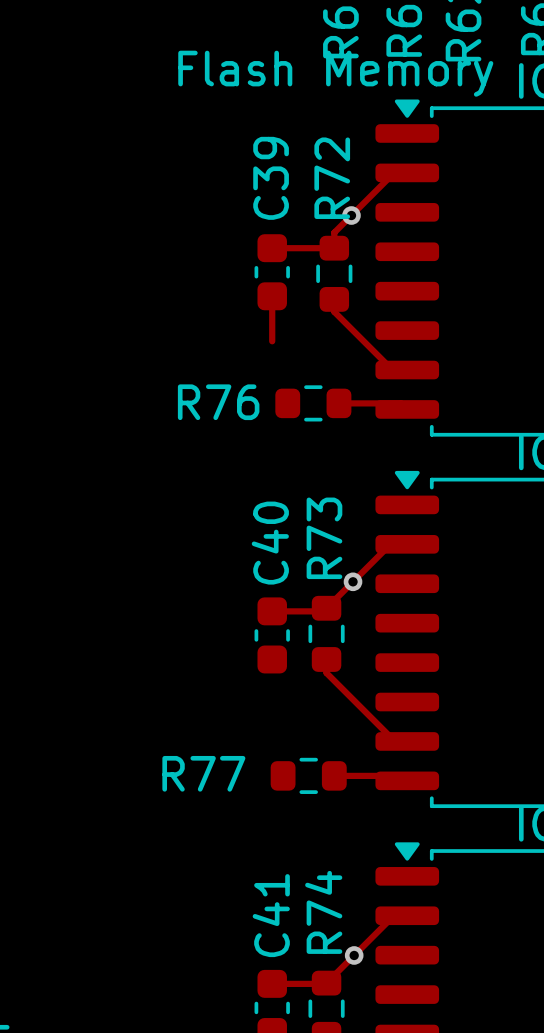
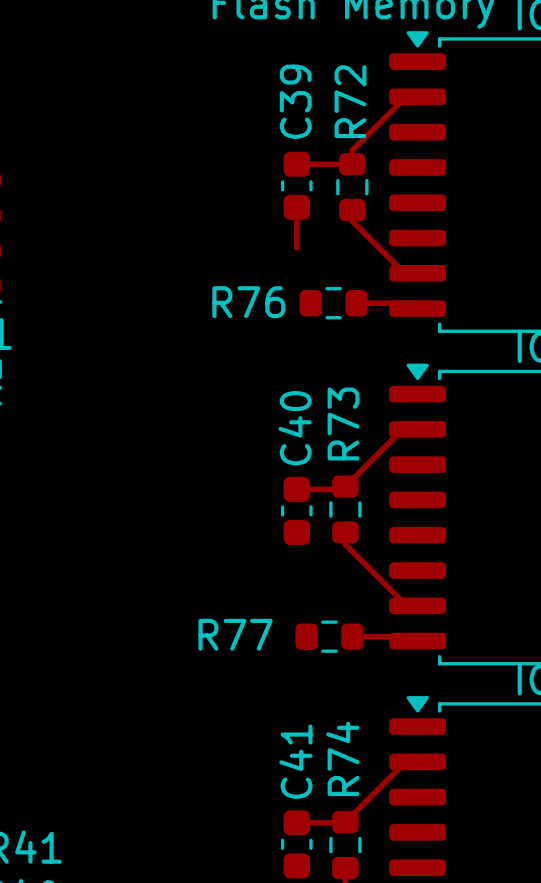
via: (351, 215) -> none
via: (353, 581) -> none
via: (354, 955) -> none

